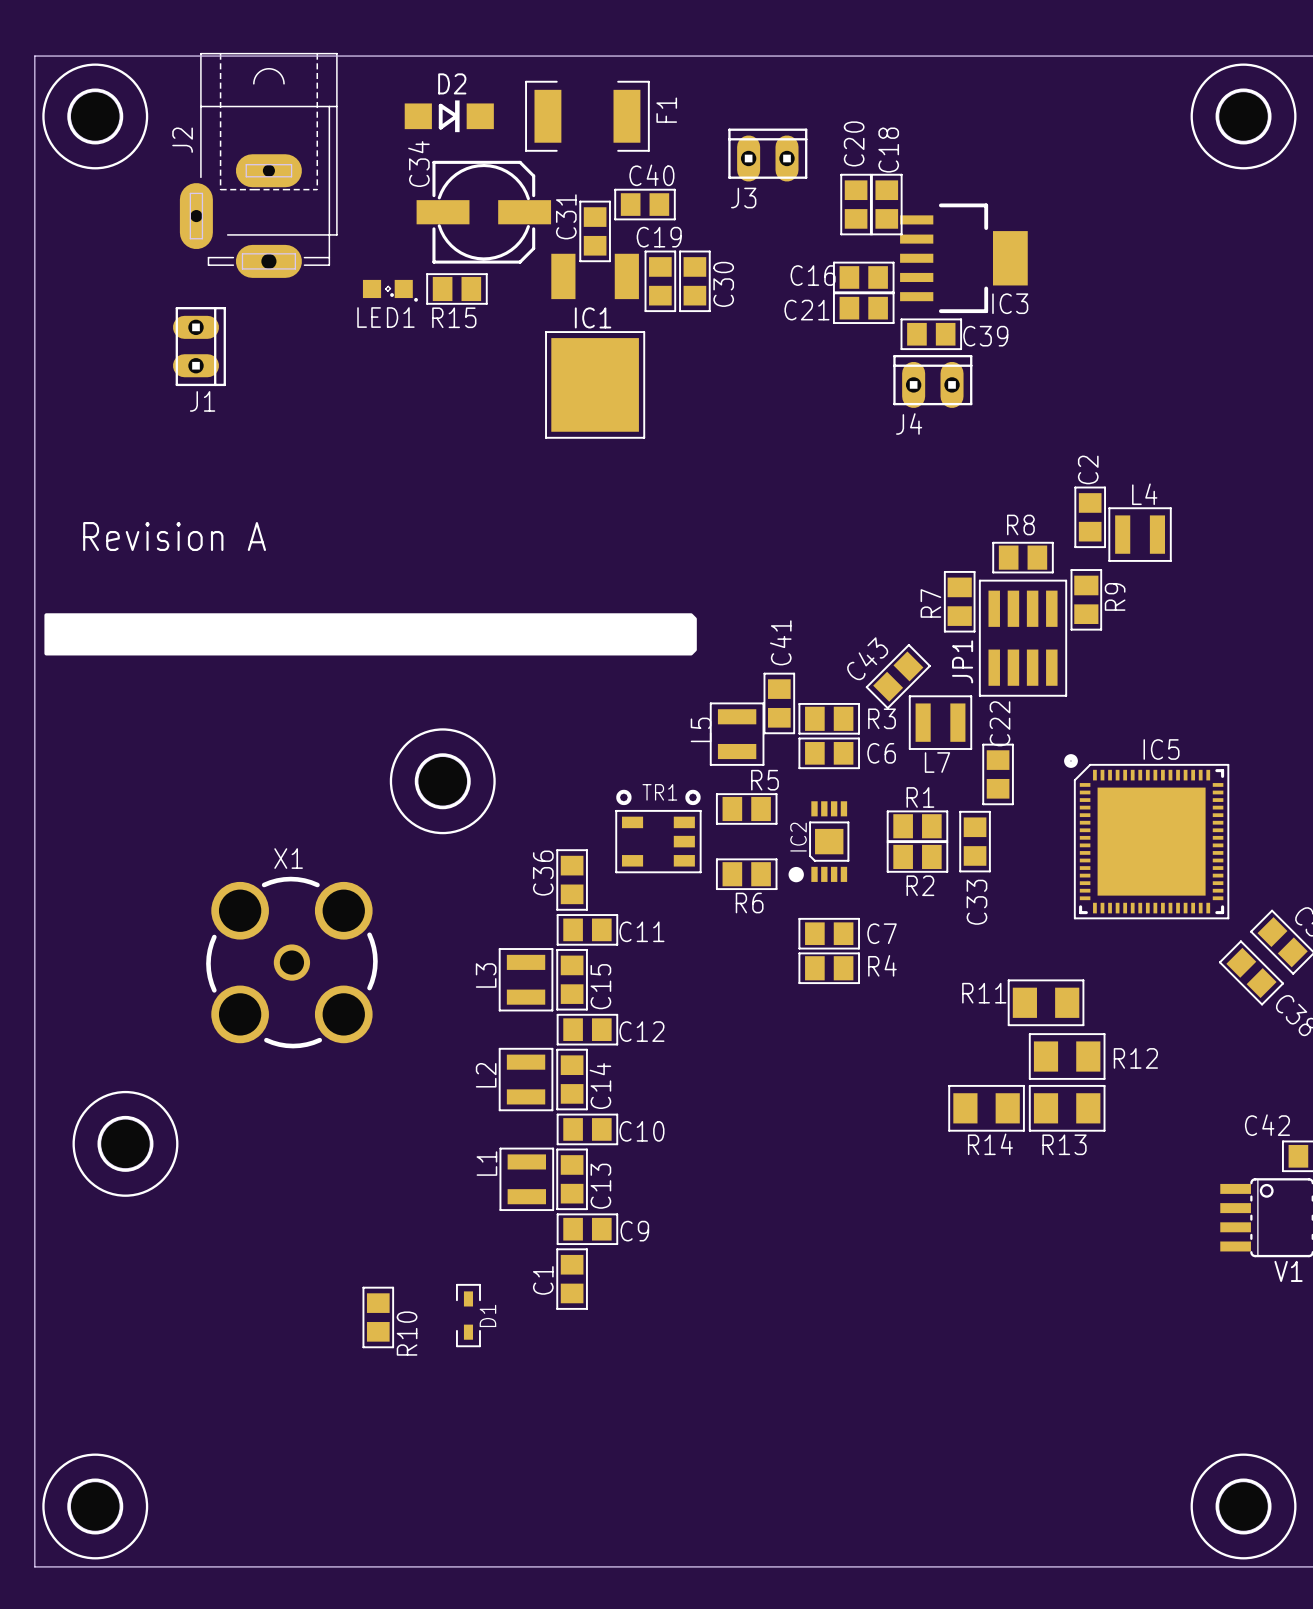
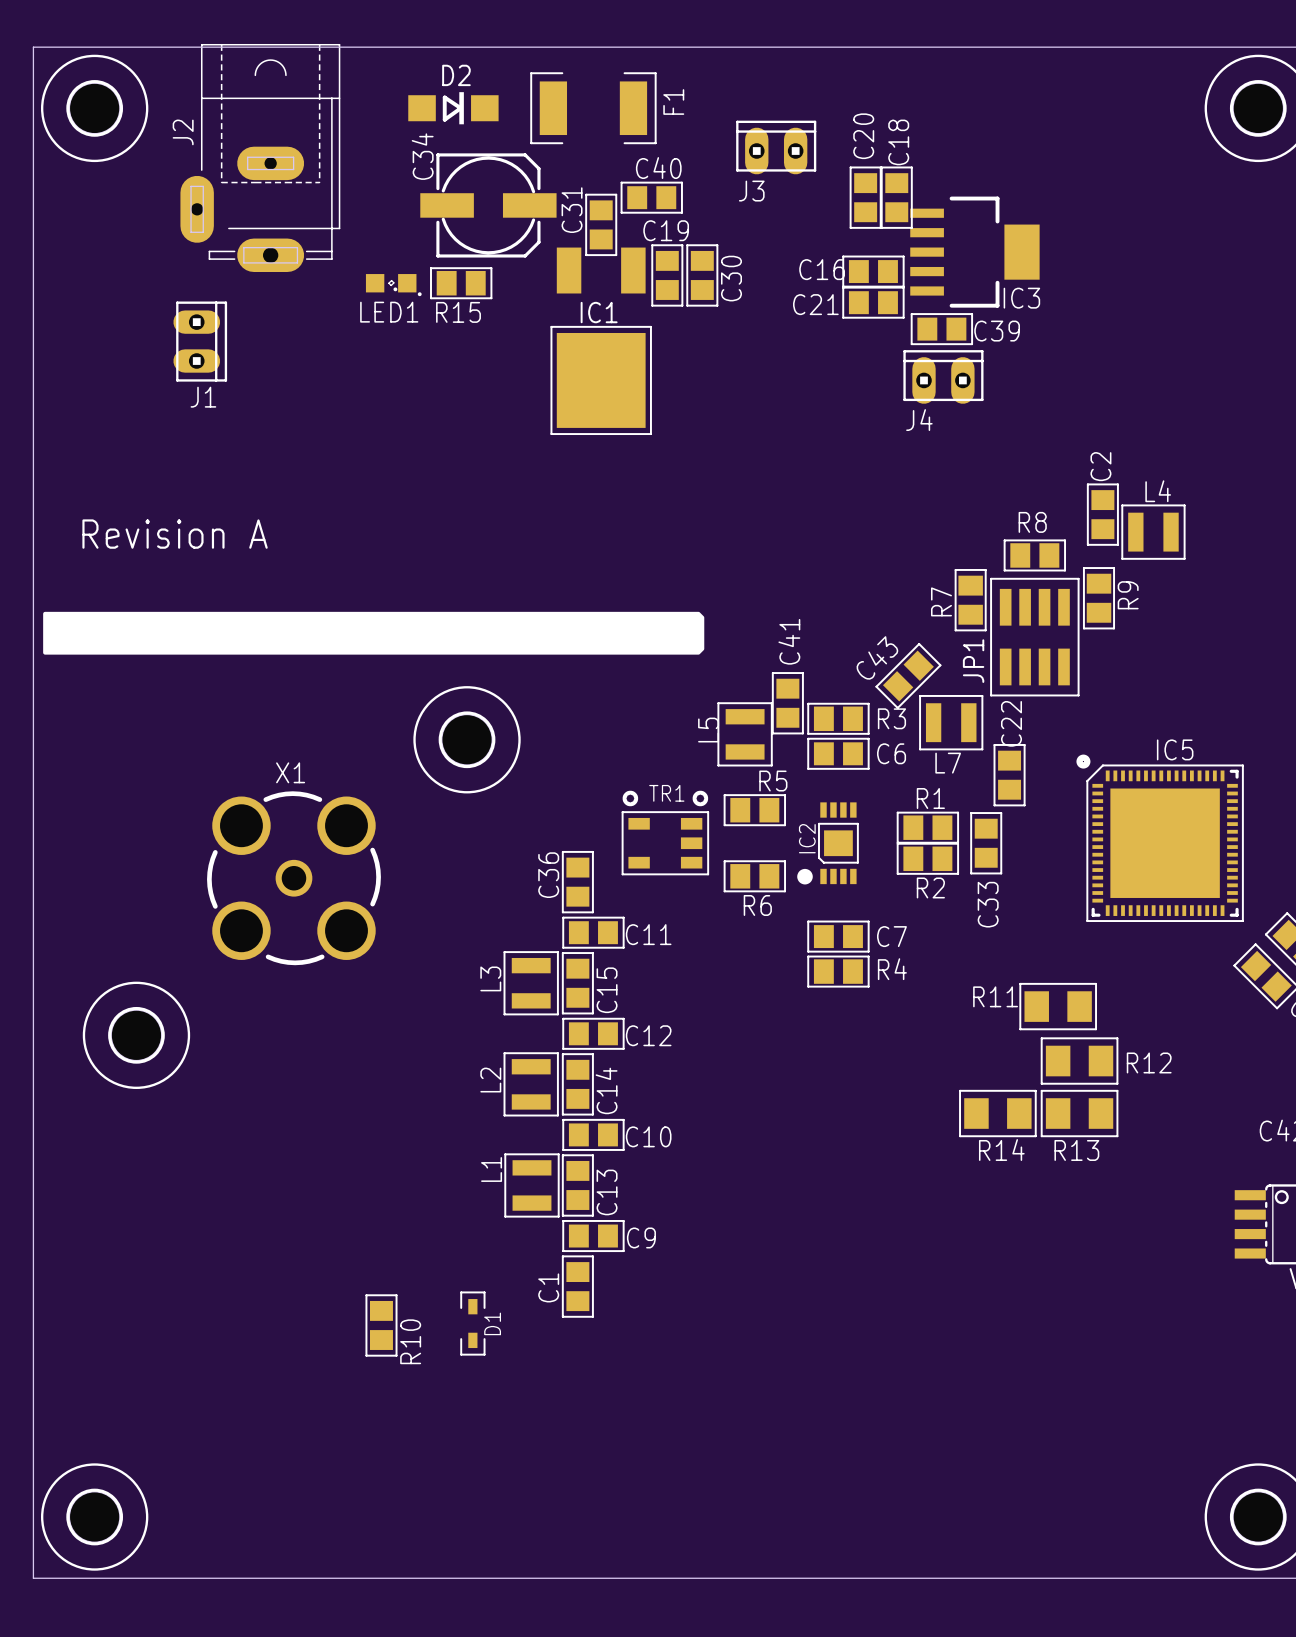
part position: (442, 781) -> (467, 739)
X1 position: (291, 962) -> (293, 878)
part position: (125, 1143) -> (136, 1035)

